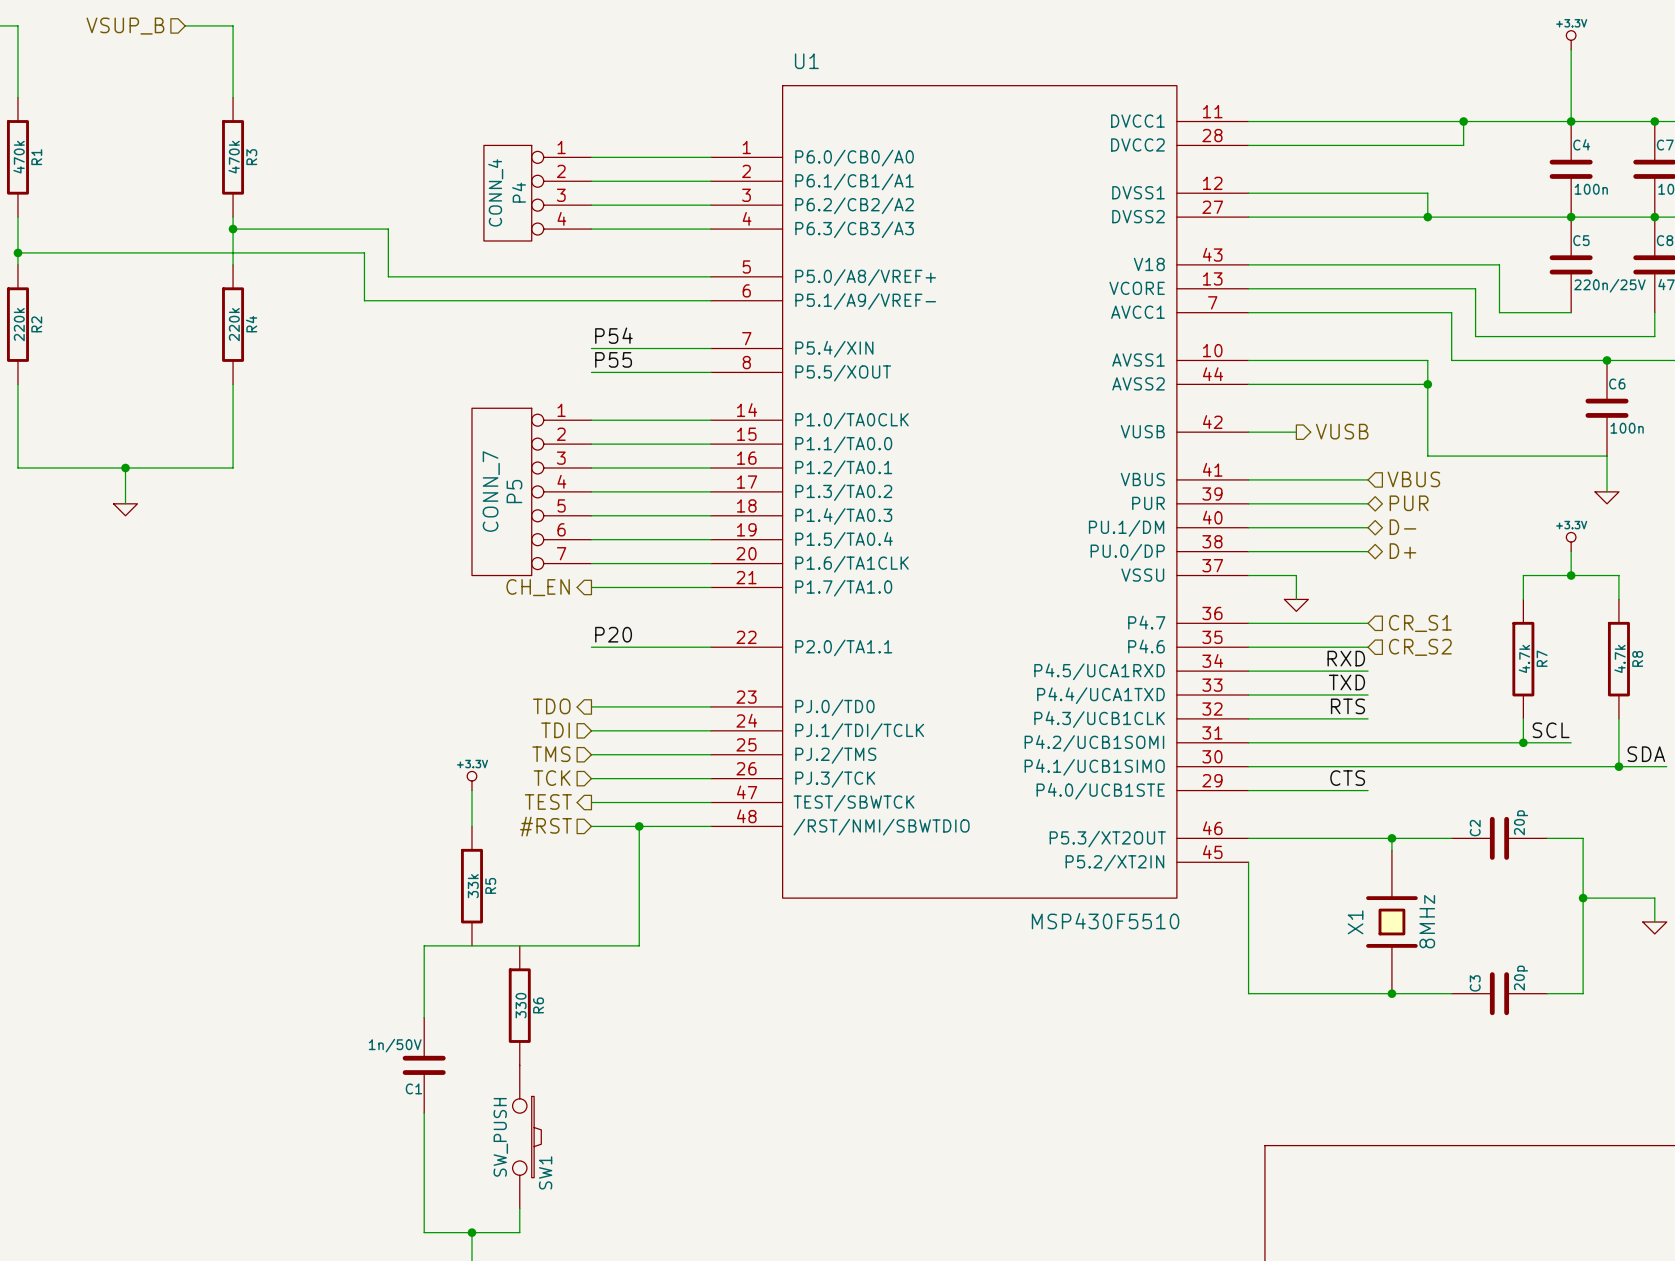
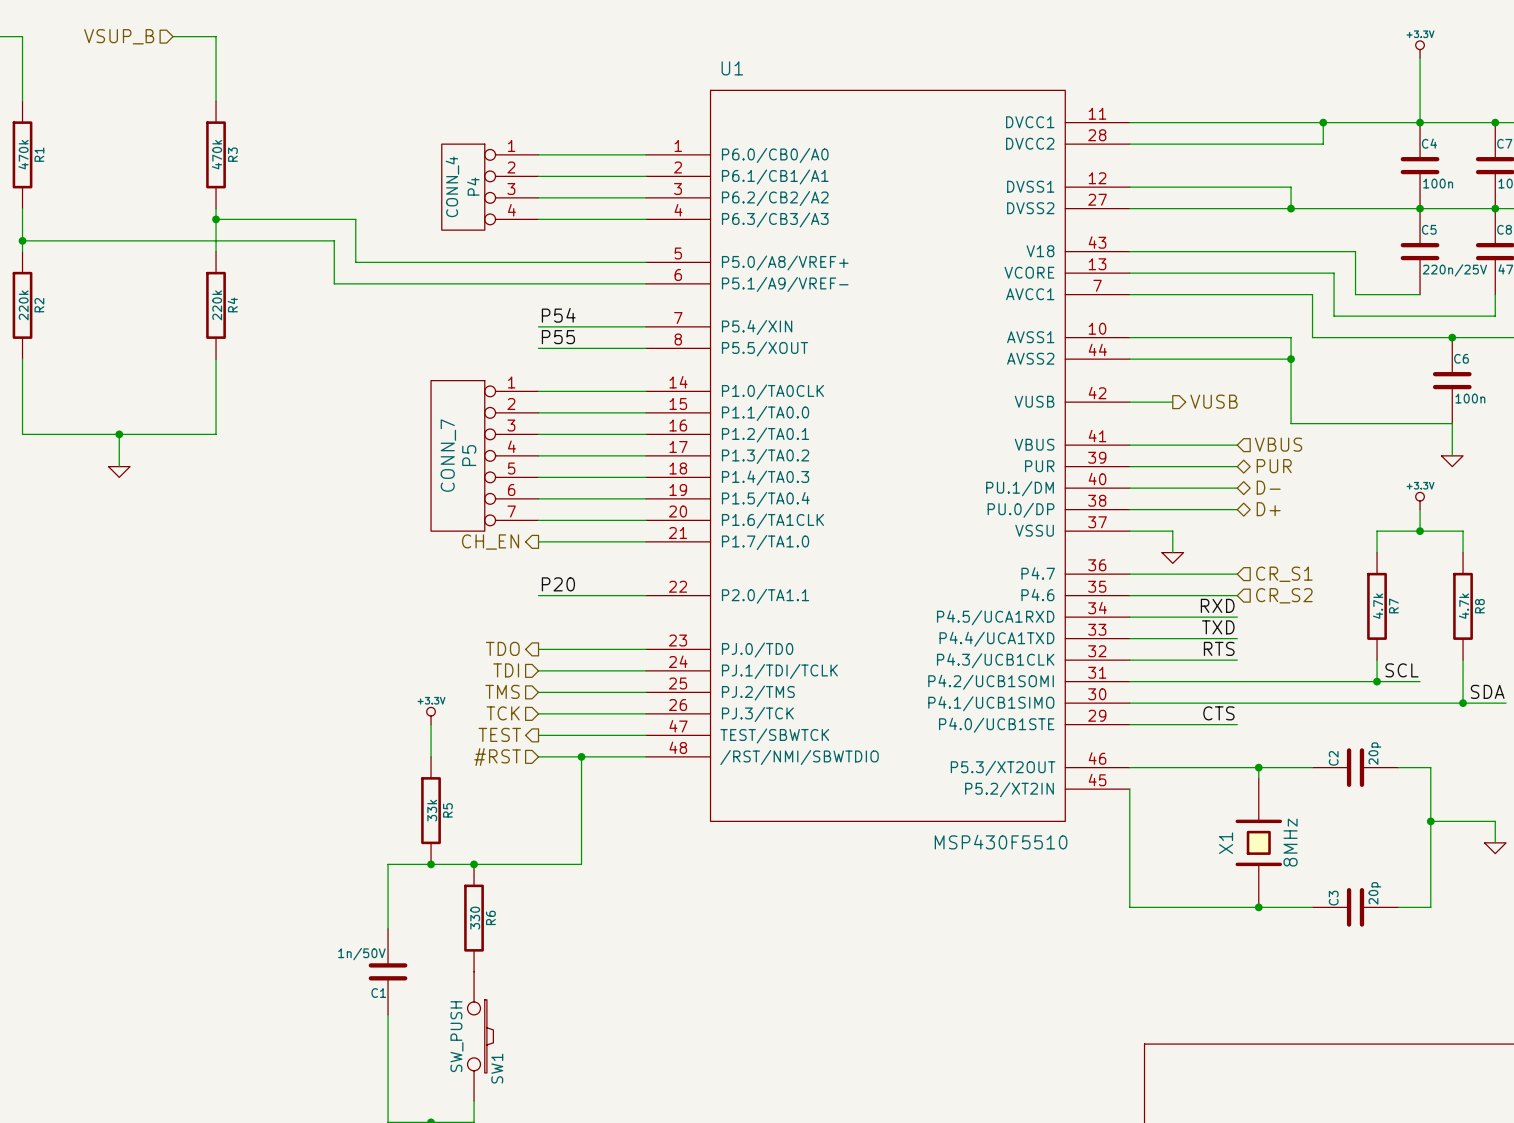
junction: none -> (431, 864)
junction: none -> (474, 864)

